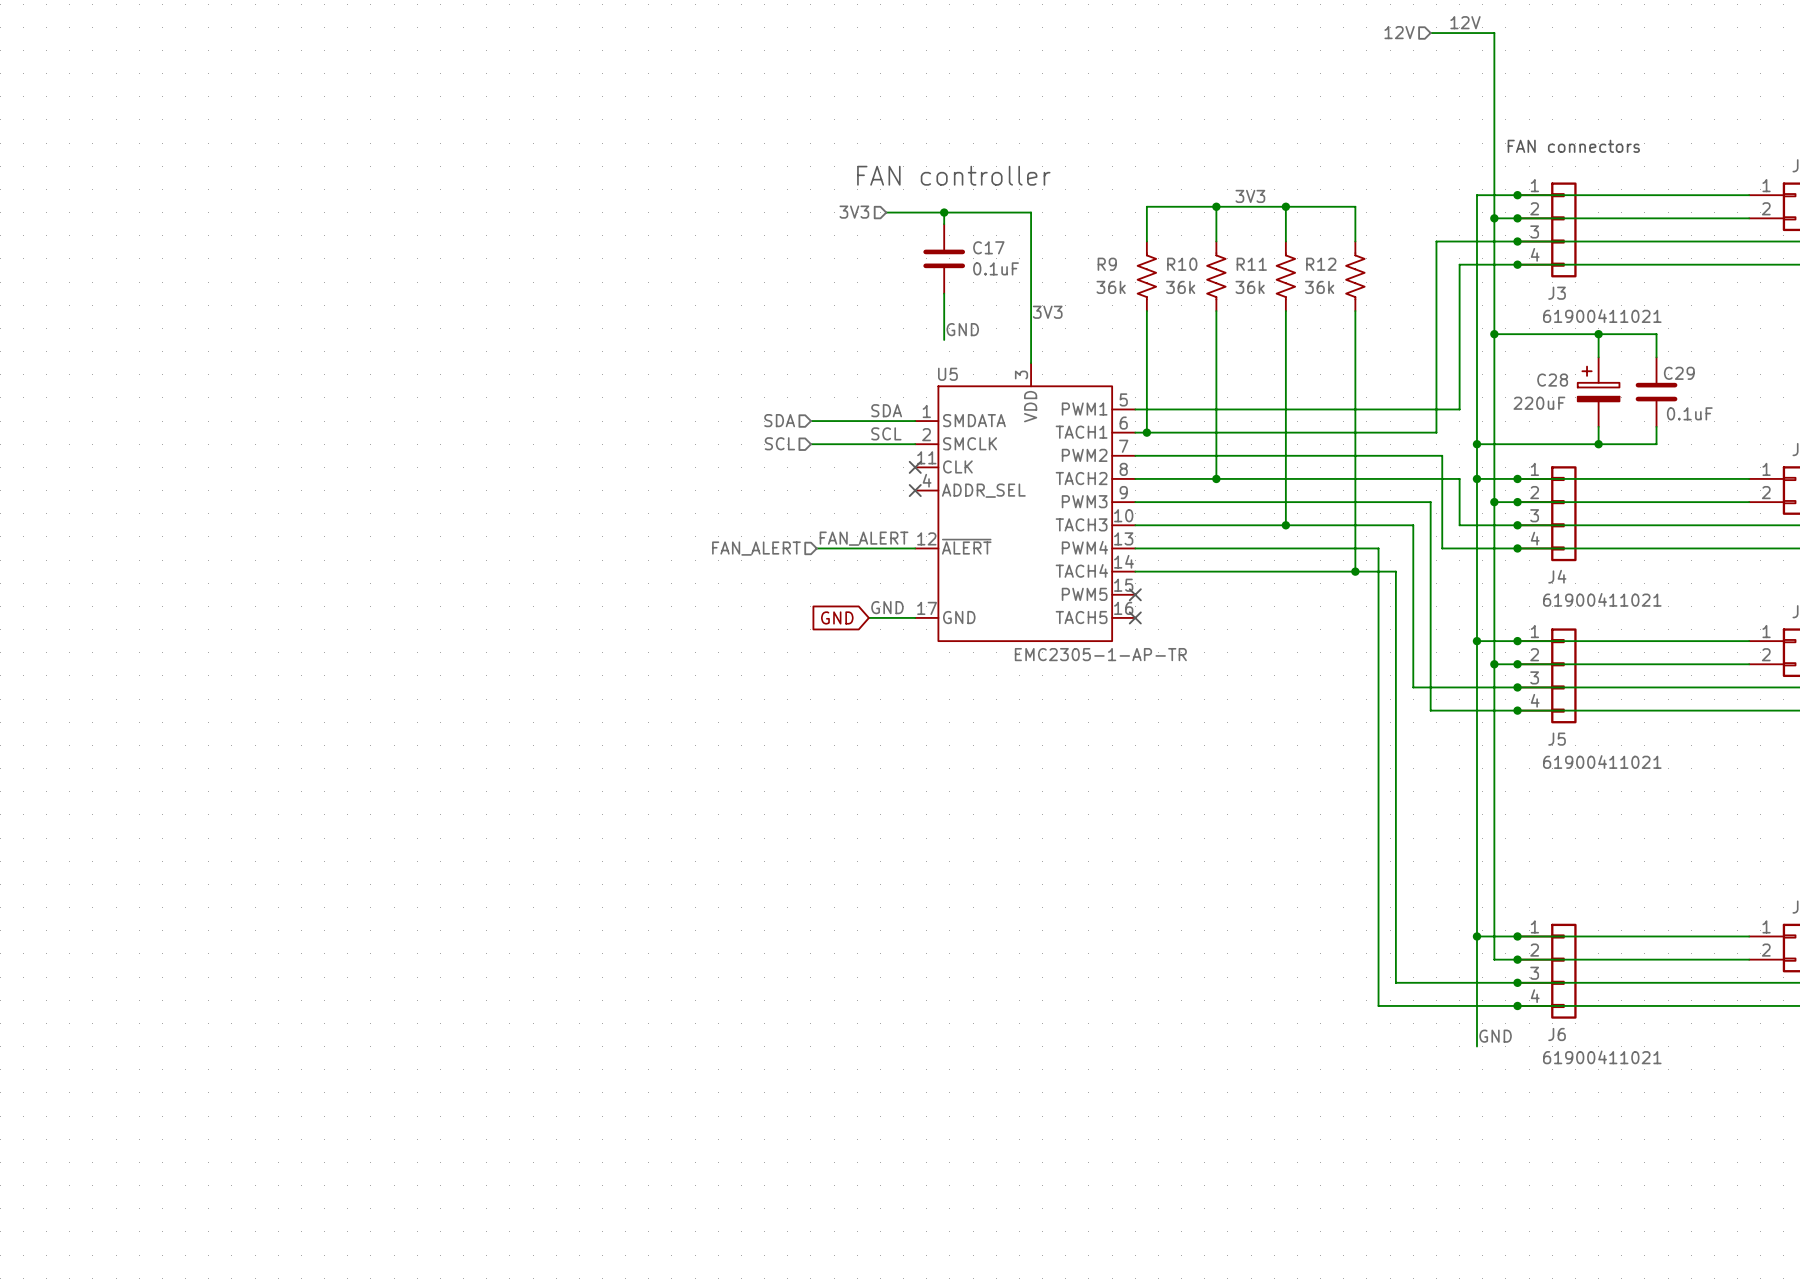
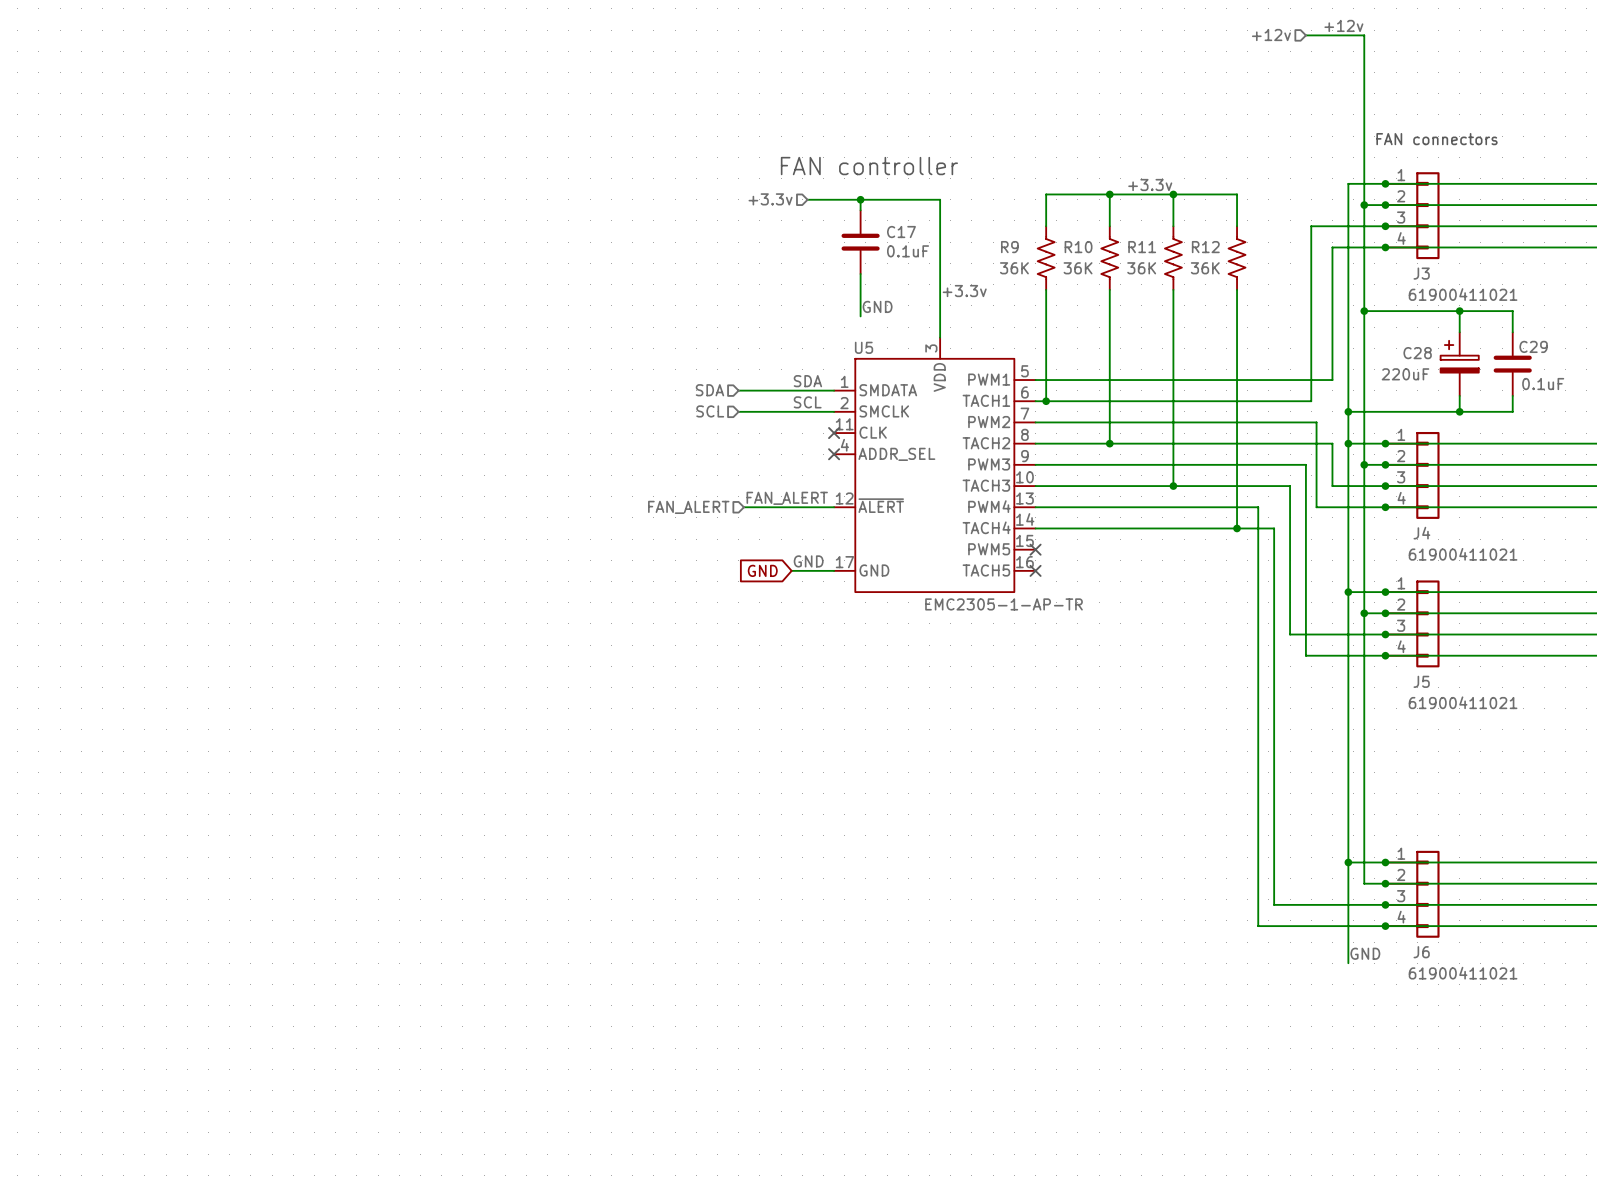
label: 12V (1465, 22) -> +12v (1343, 25)
hierarchical label: 12V (1399, 32) -> +12v (1271, 35)
label: 3V3 (1250, 196) -> +3.3v (1150, 184)
hierarchical label: 3V3 (854, 212) -> +3.3v (770, 199)
R9 value: 36k (1111, 287) -> 36K (1014, 268)
R10 value: 36k (1180, 287) -> 36K (1078, 268)
R11 value: 36k (1250, 287) -> 36K (1141, 268)
R12 value: 36k (1319, 287) -> 36K (1205, 268)
label: 3V3 (1047, 312) -> +3.3v (964, 291)

